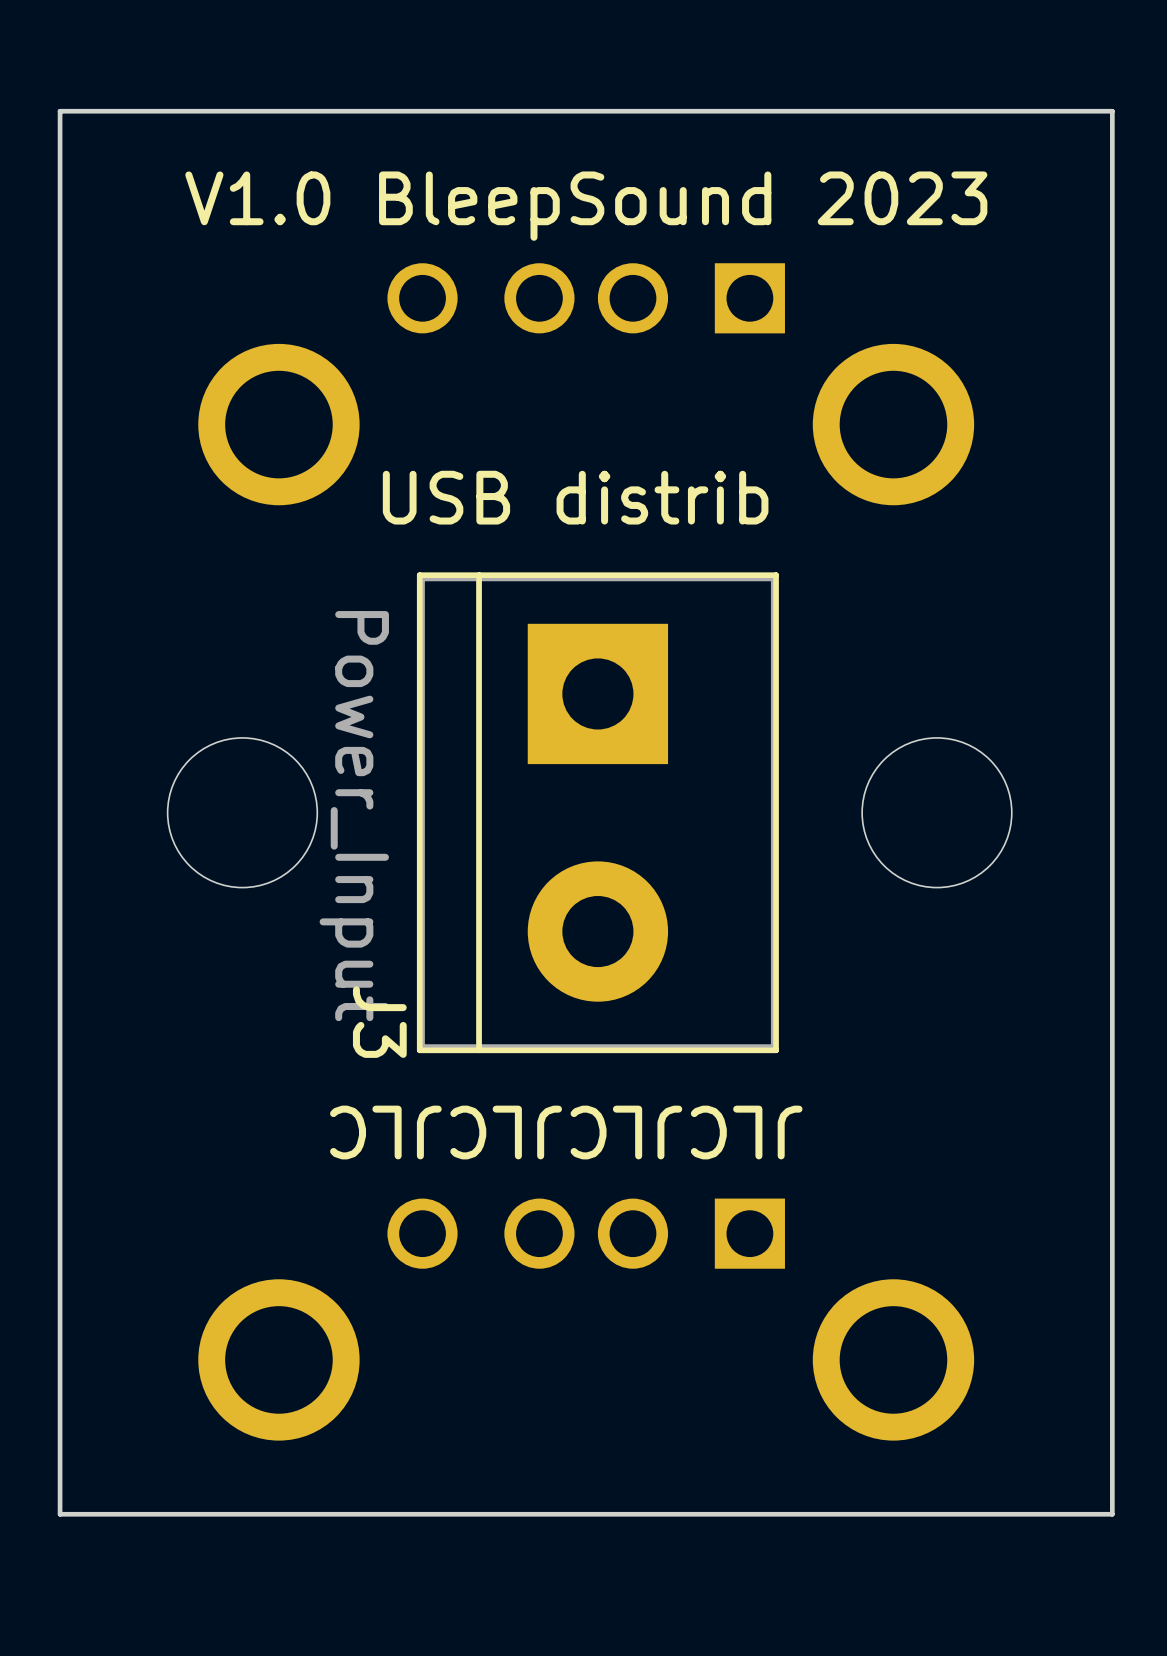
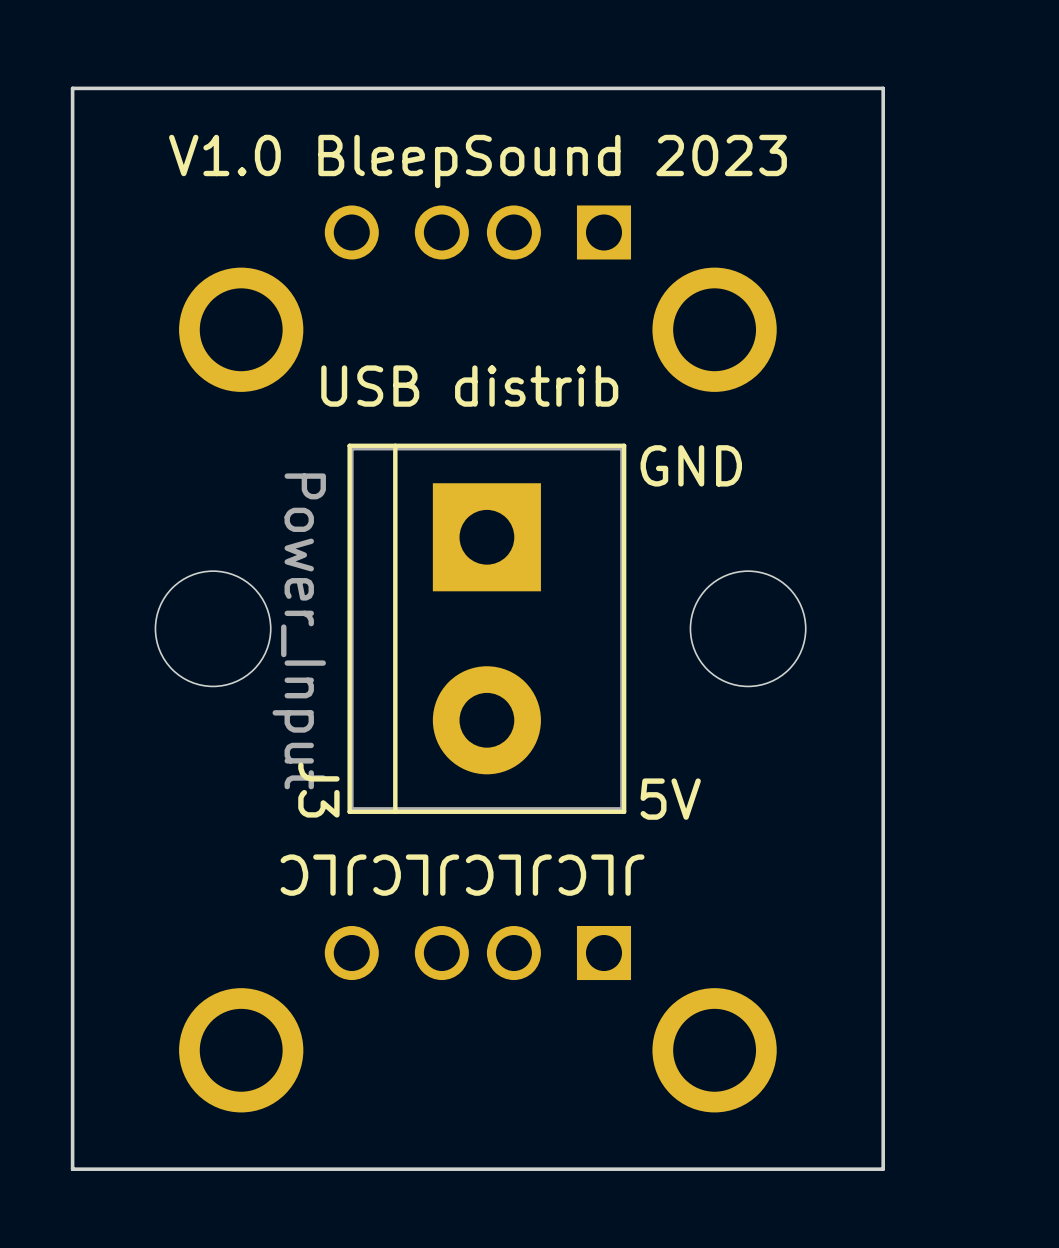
text: none -> GND (691, 465)
text: none -> 5V (670, 799)

